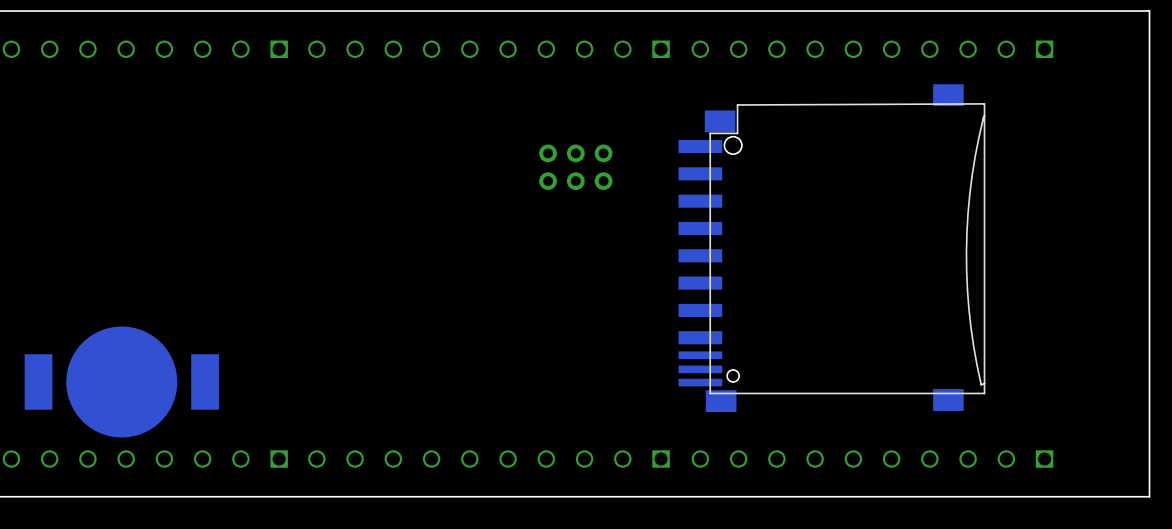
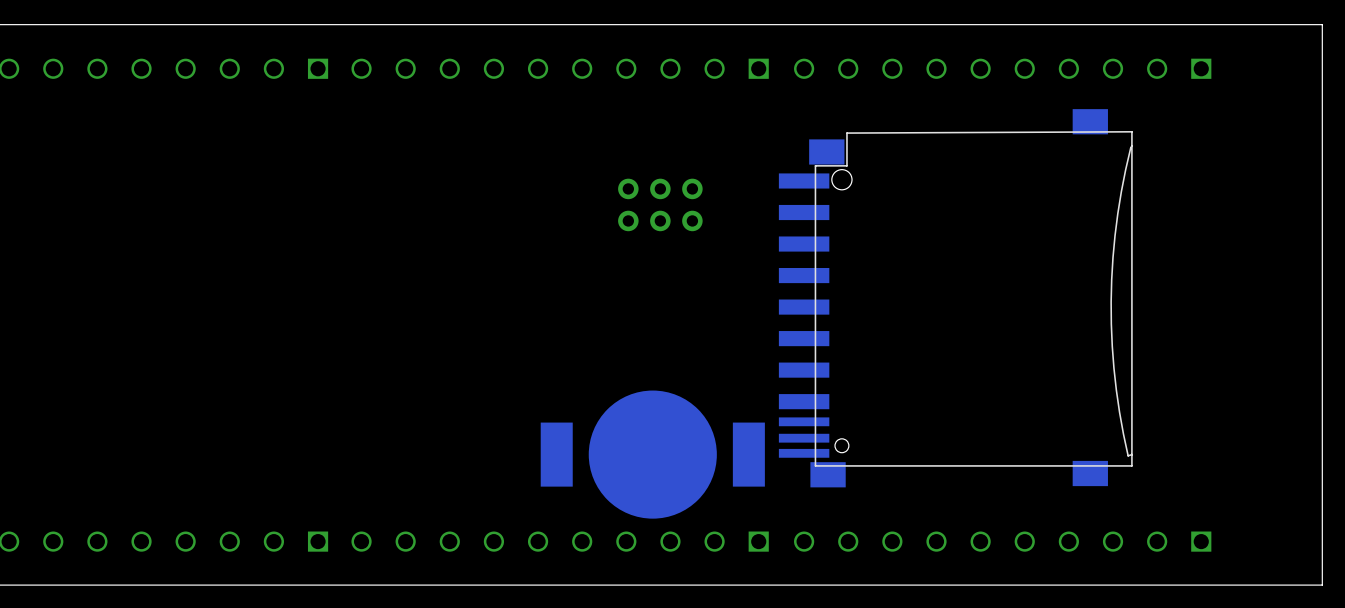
part: (121, 381) -> none
part: none -> (652, 454)

